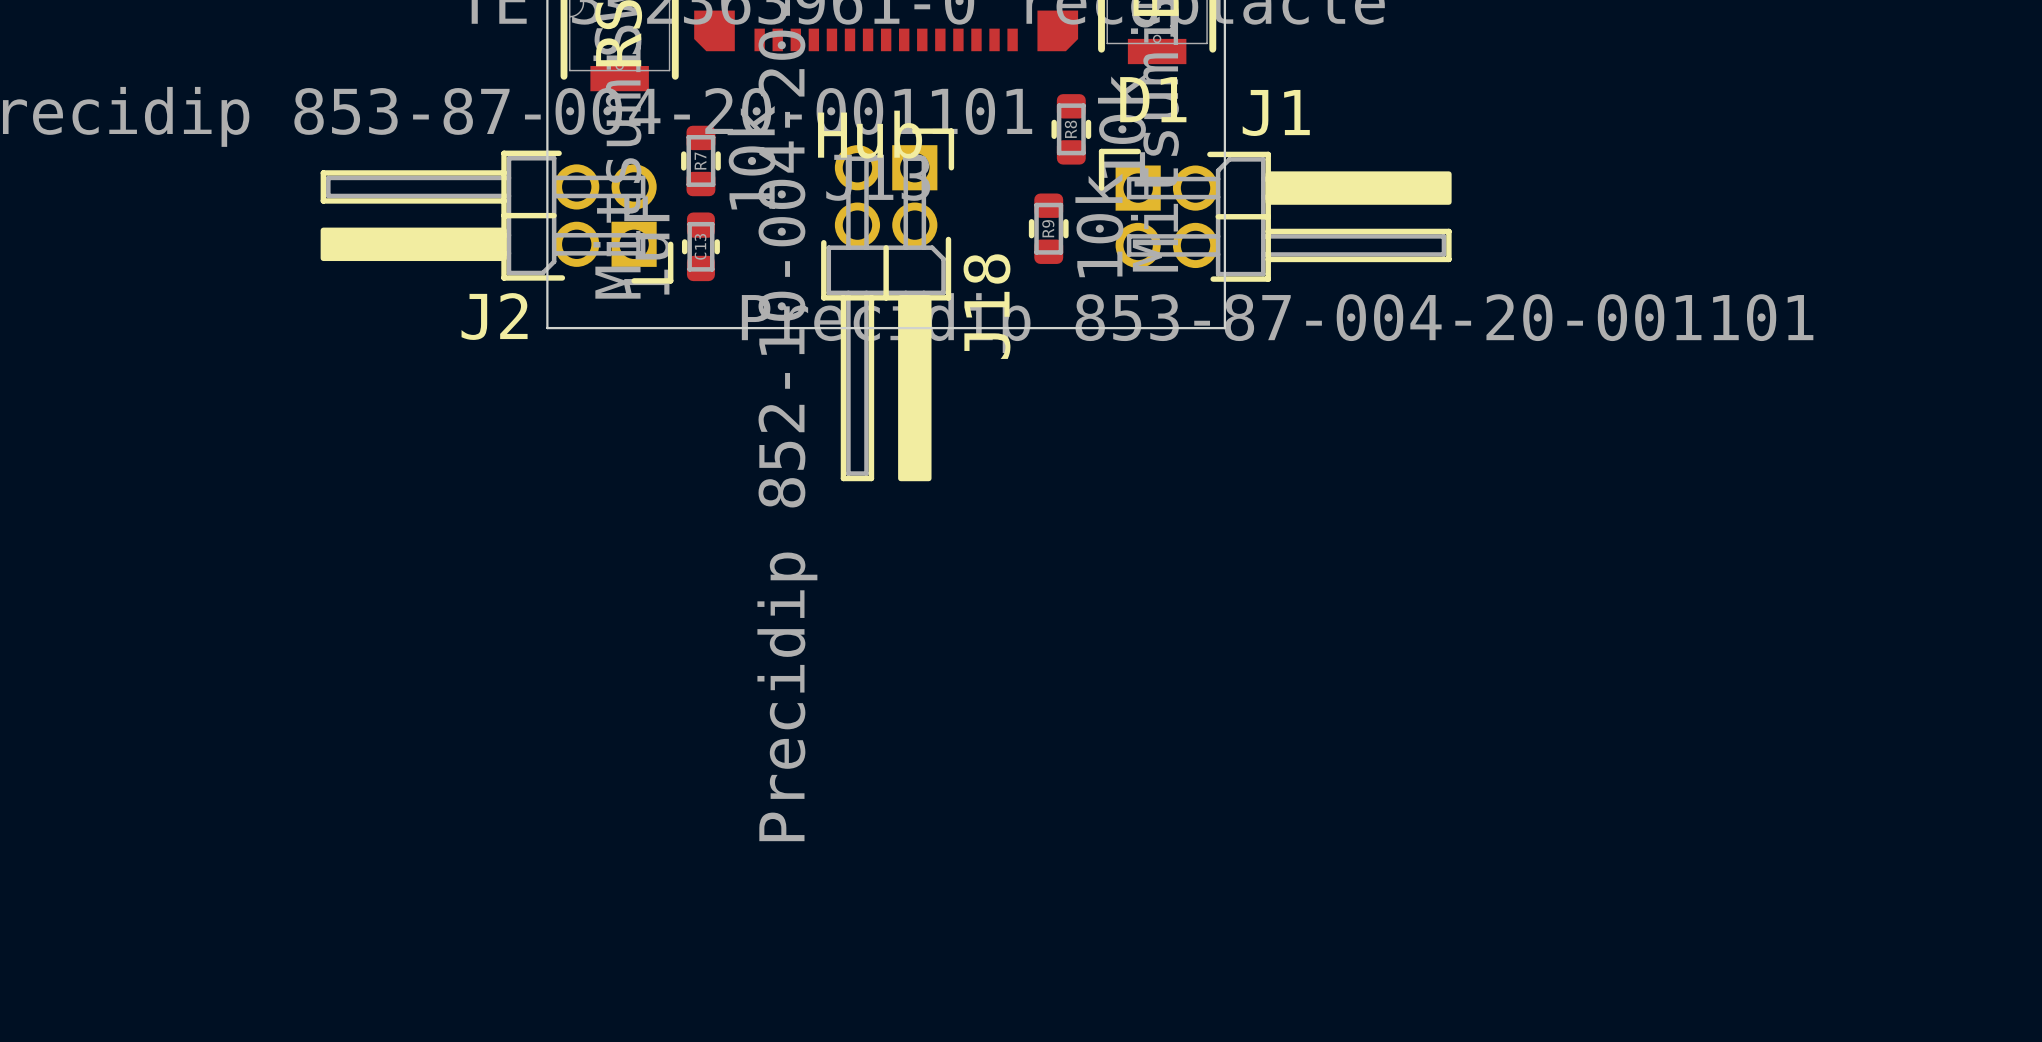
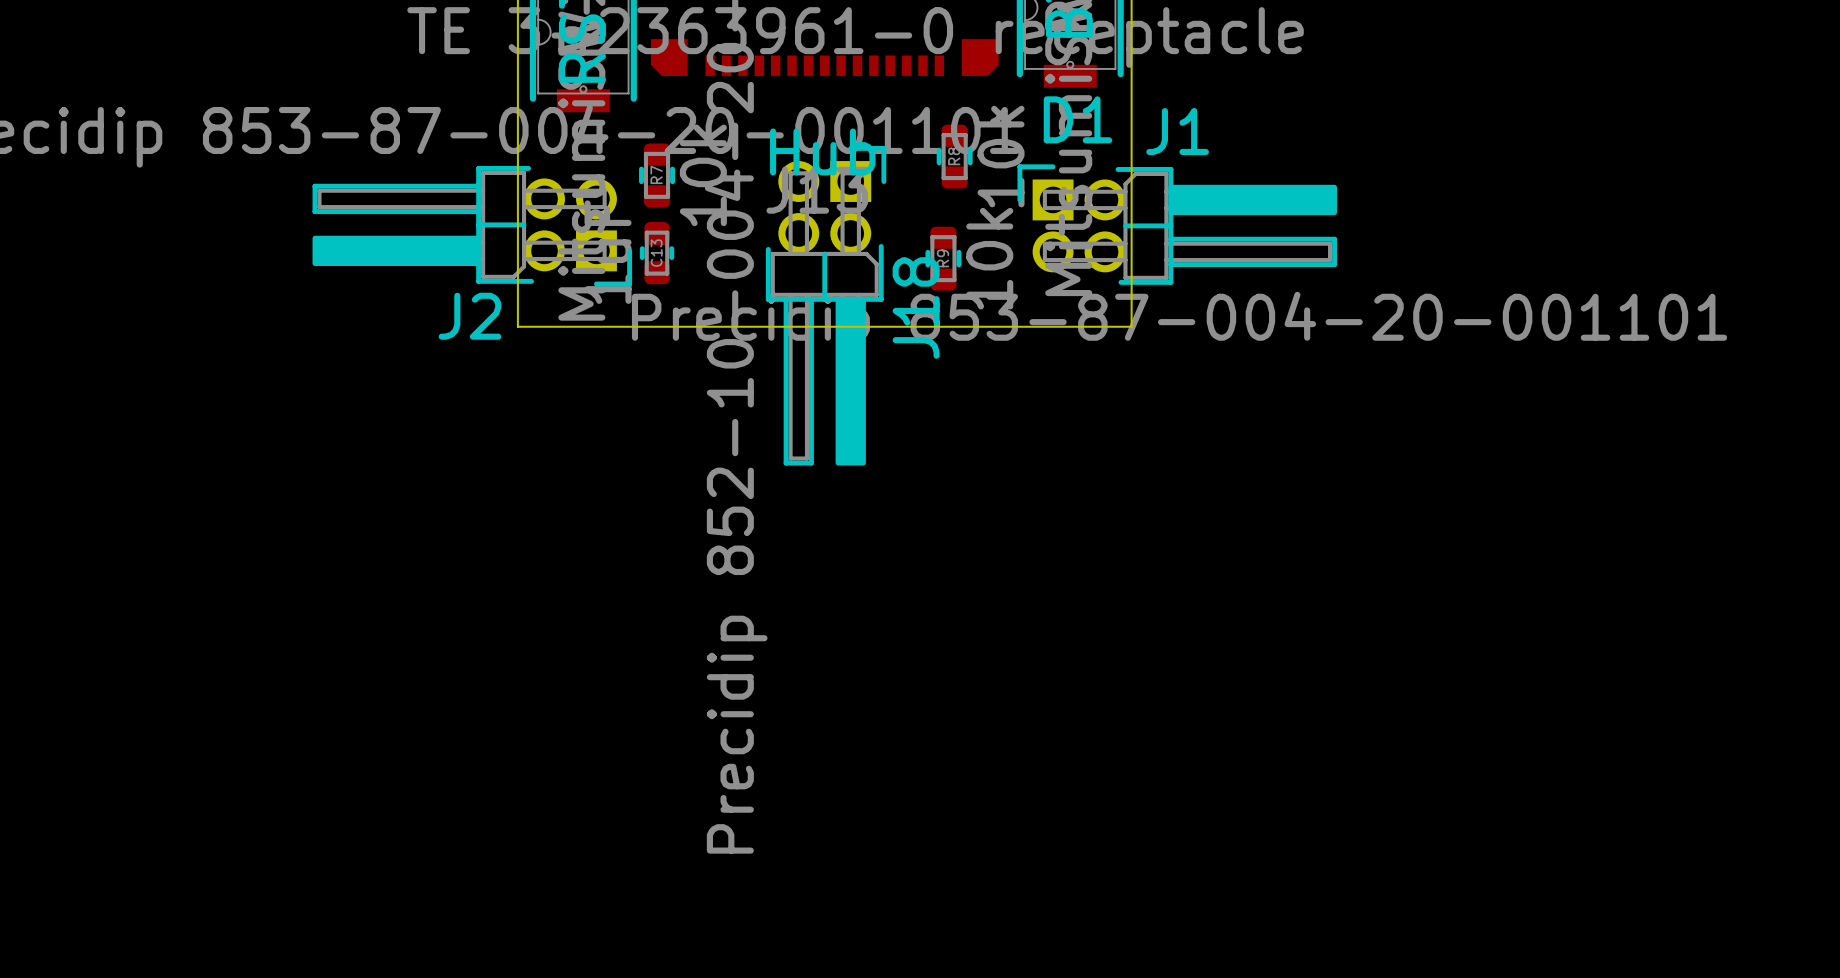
R8 position: (1071, 129) -> (954, 156)
R9 position: (1048, 228) -> (943, 258)

